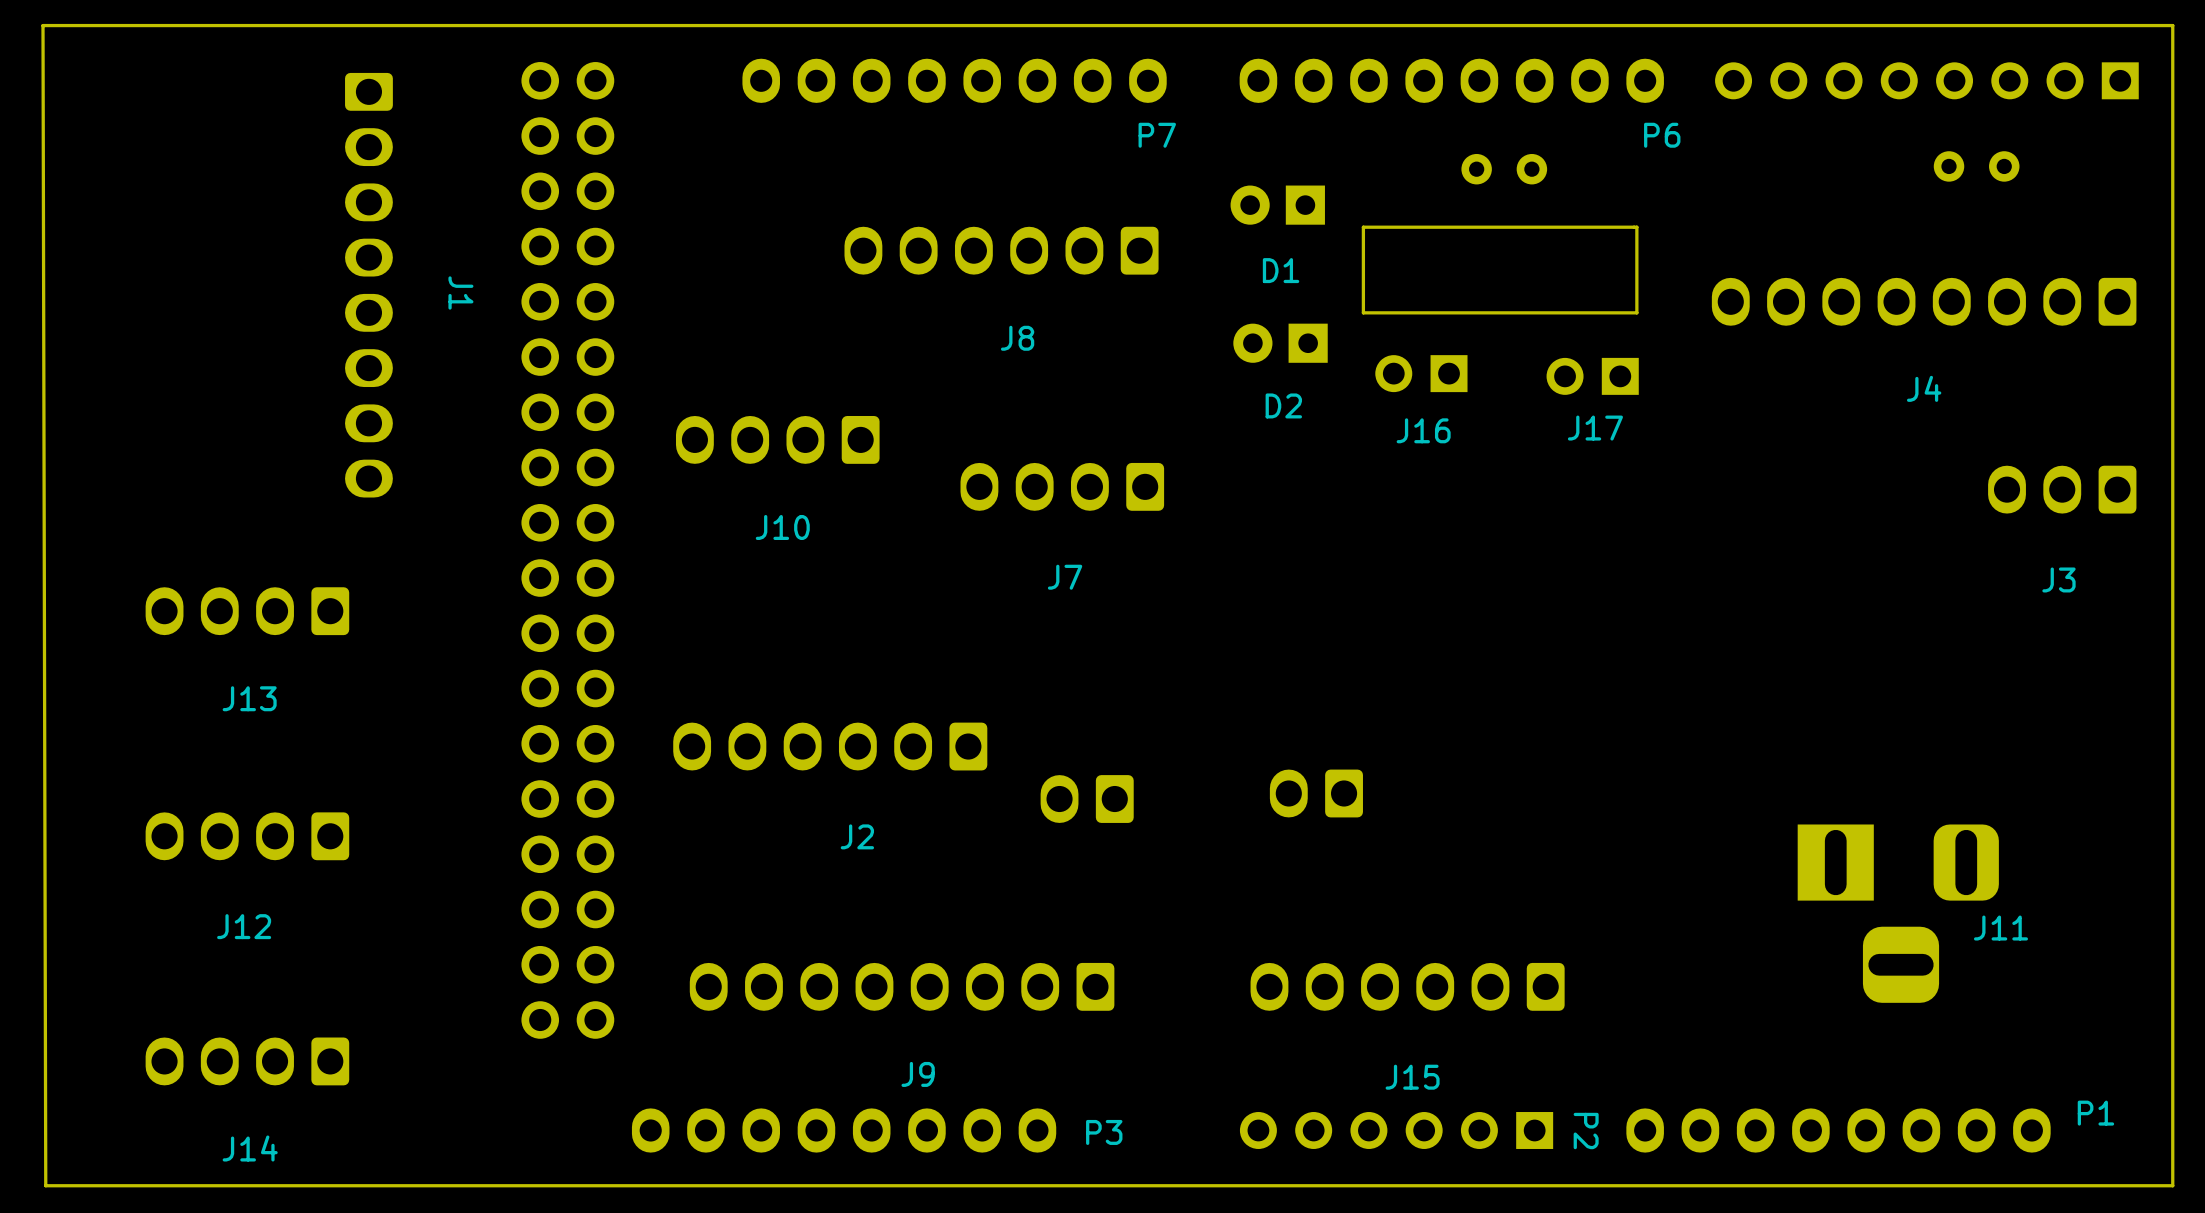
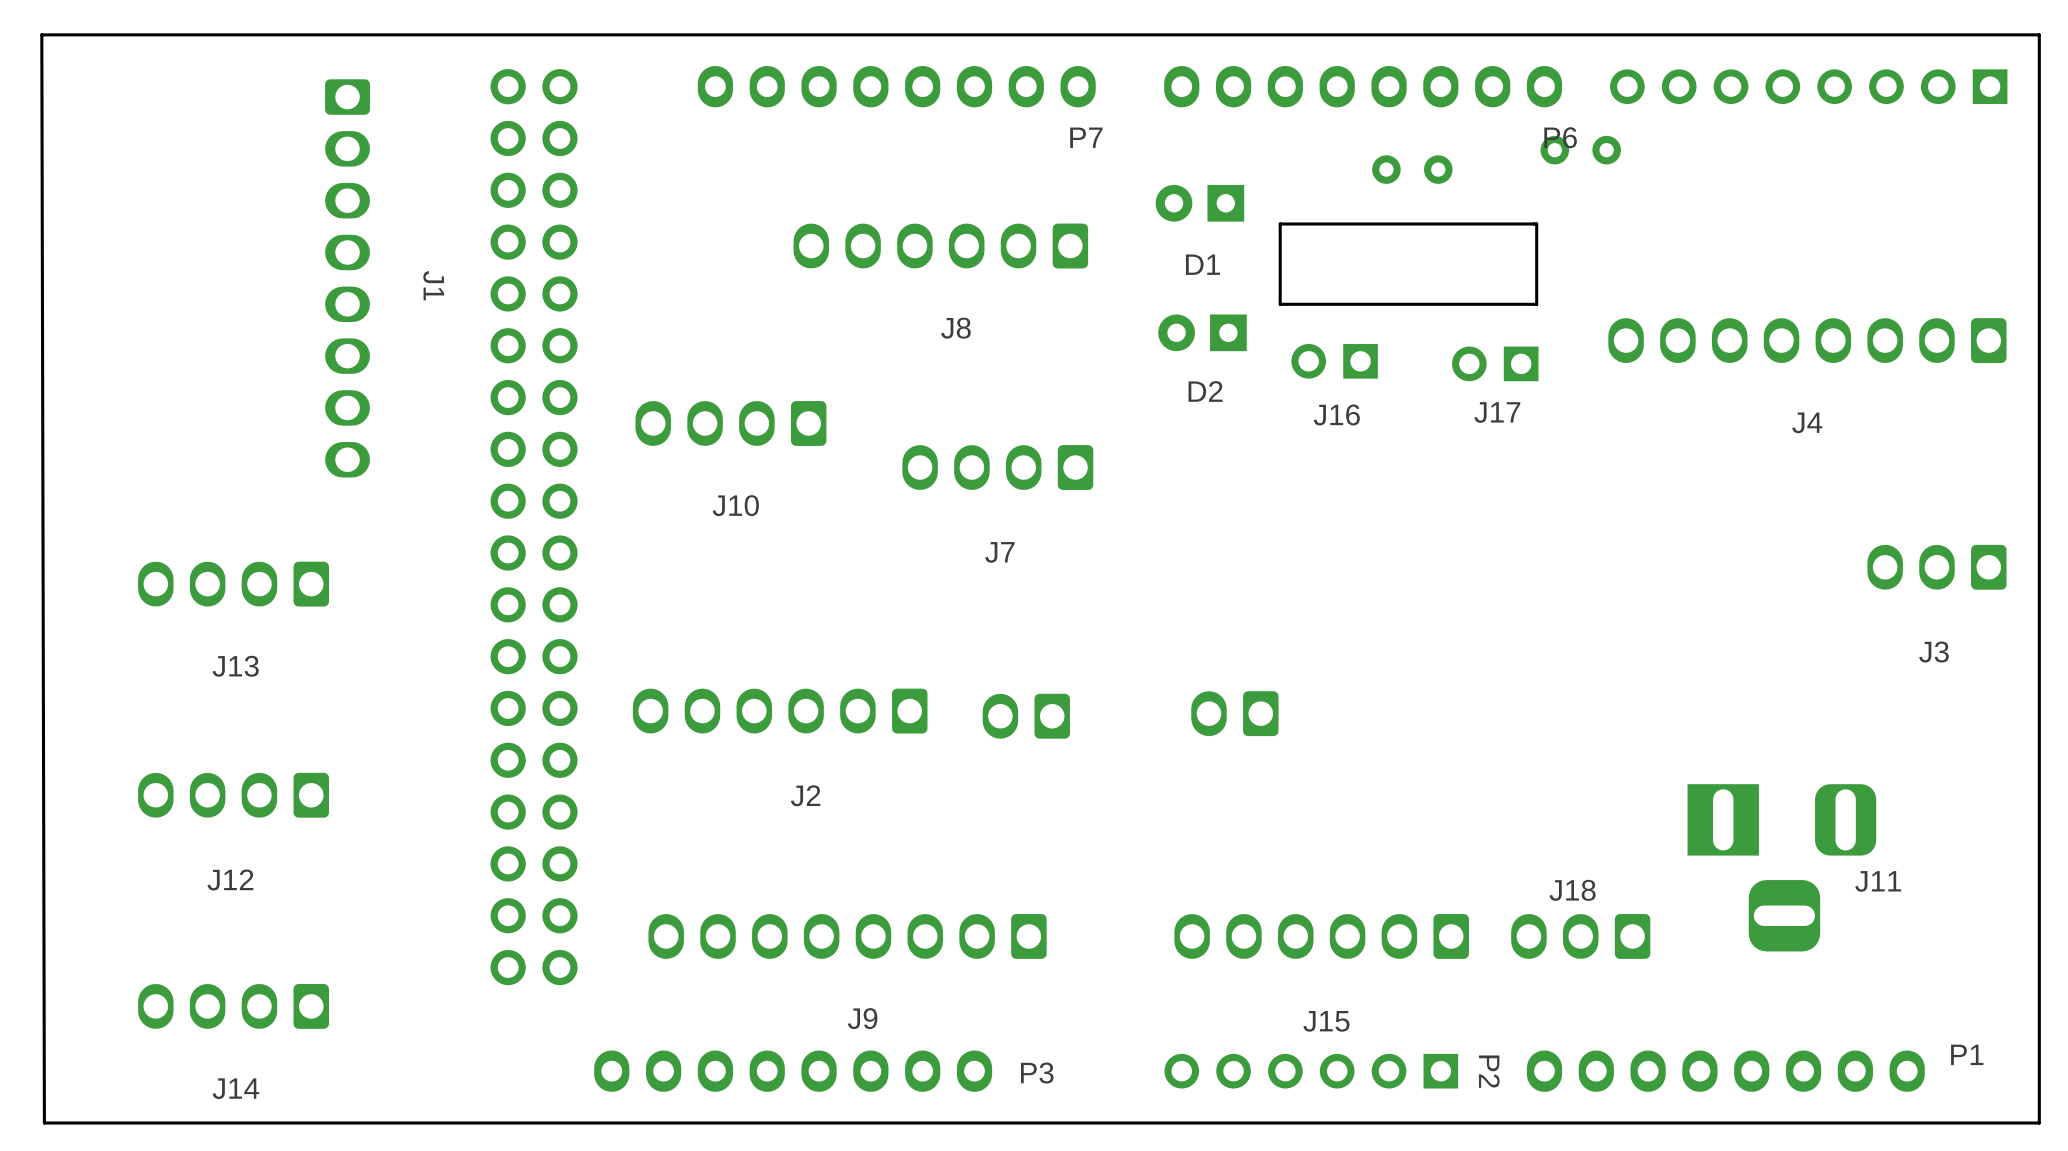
part position: (1976, 166) -> (1580, 150)
J4 position: (1924, 301) -> (1807, 340)
J3 position: (2062, 489) -> (1936, 567)
part position: (1316, 793) -> (1234, 713)
part position: (1087, 799) -> (1026, 716)
J18: none -> (1580, 936)

